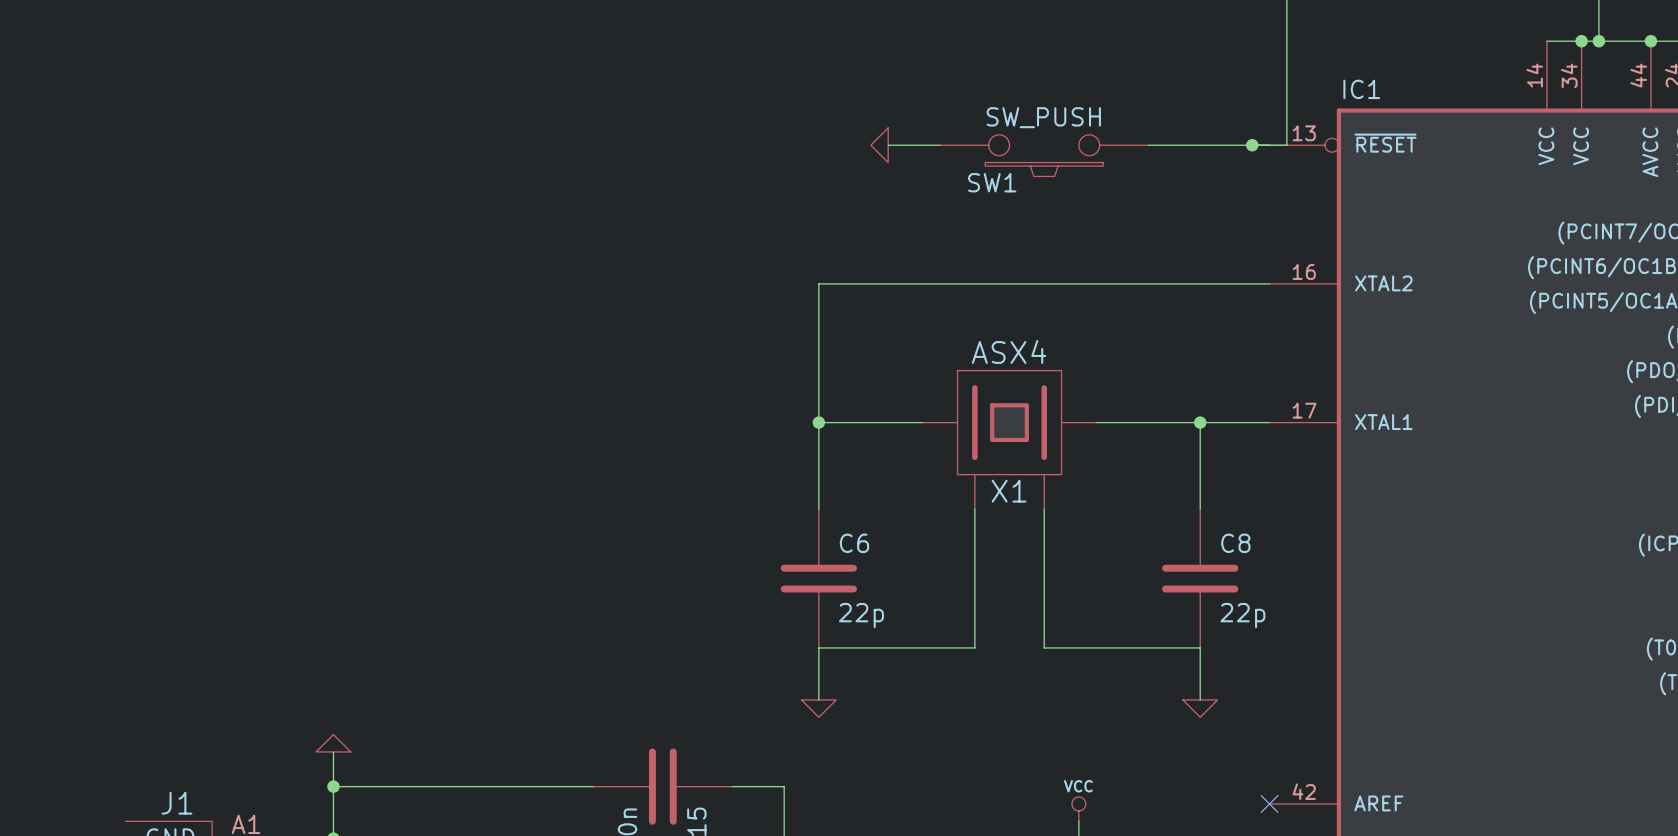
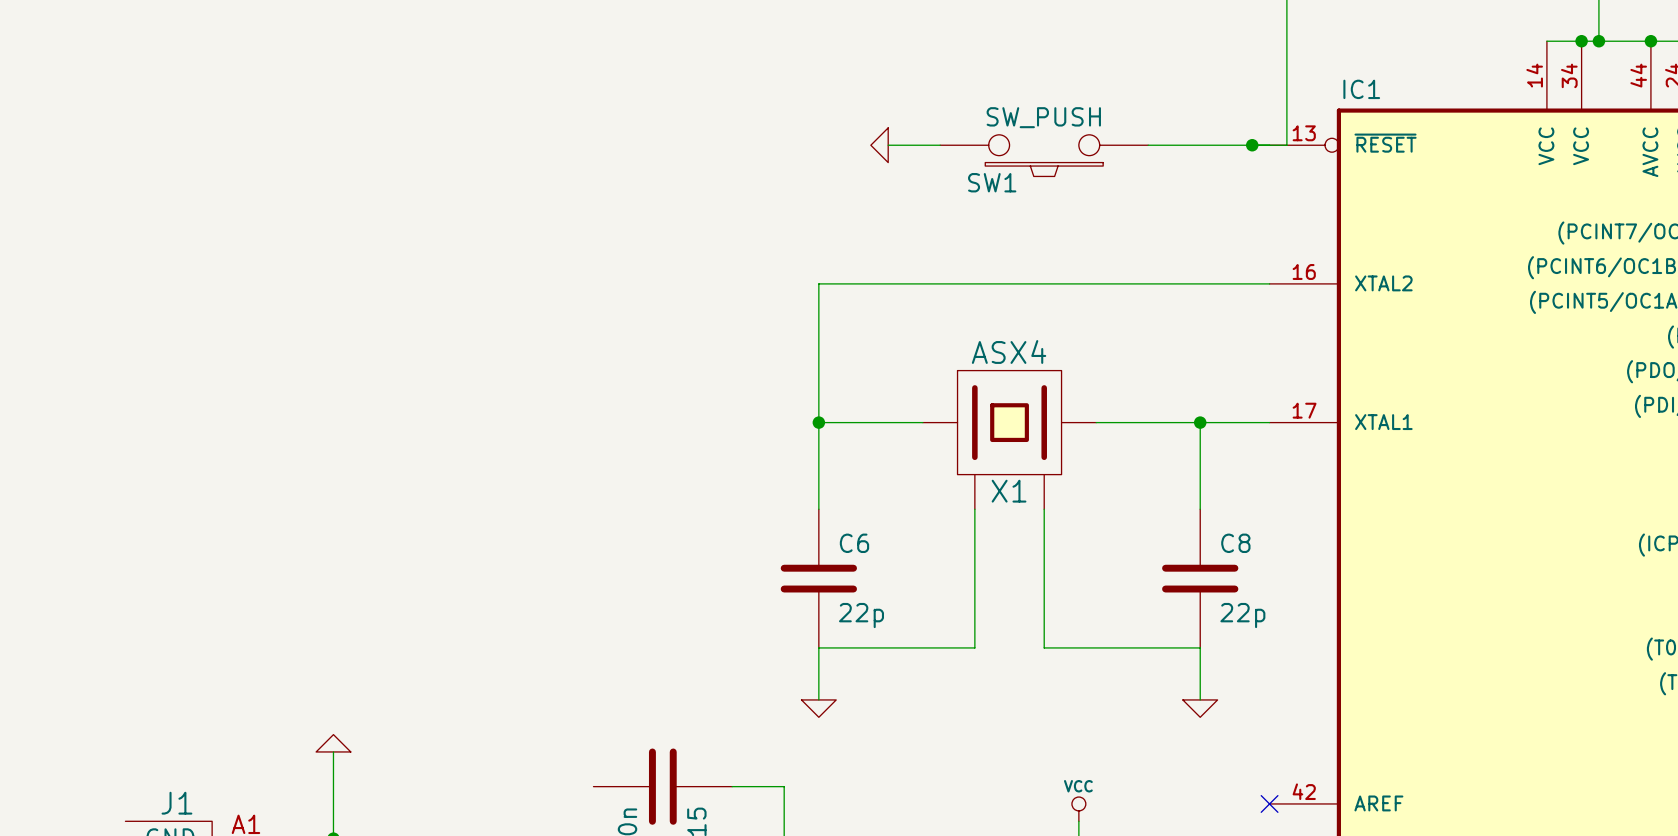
wire: (333, 786) (593, 786) -> none
junction: (333, 786) -> none

